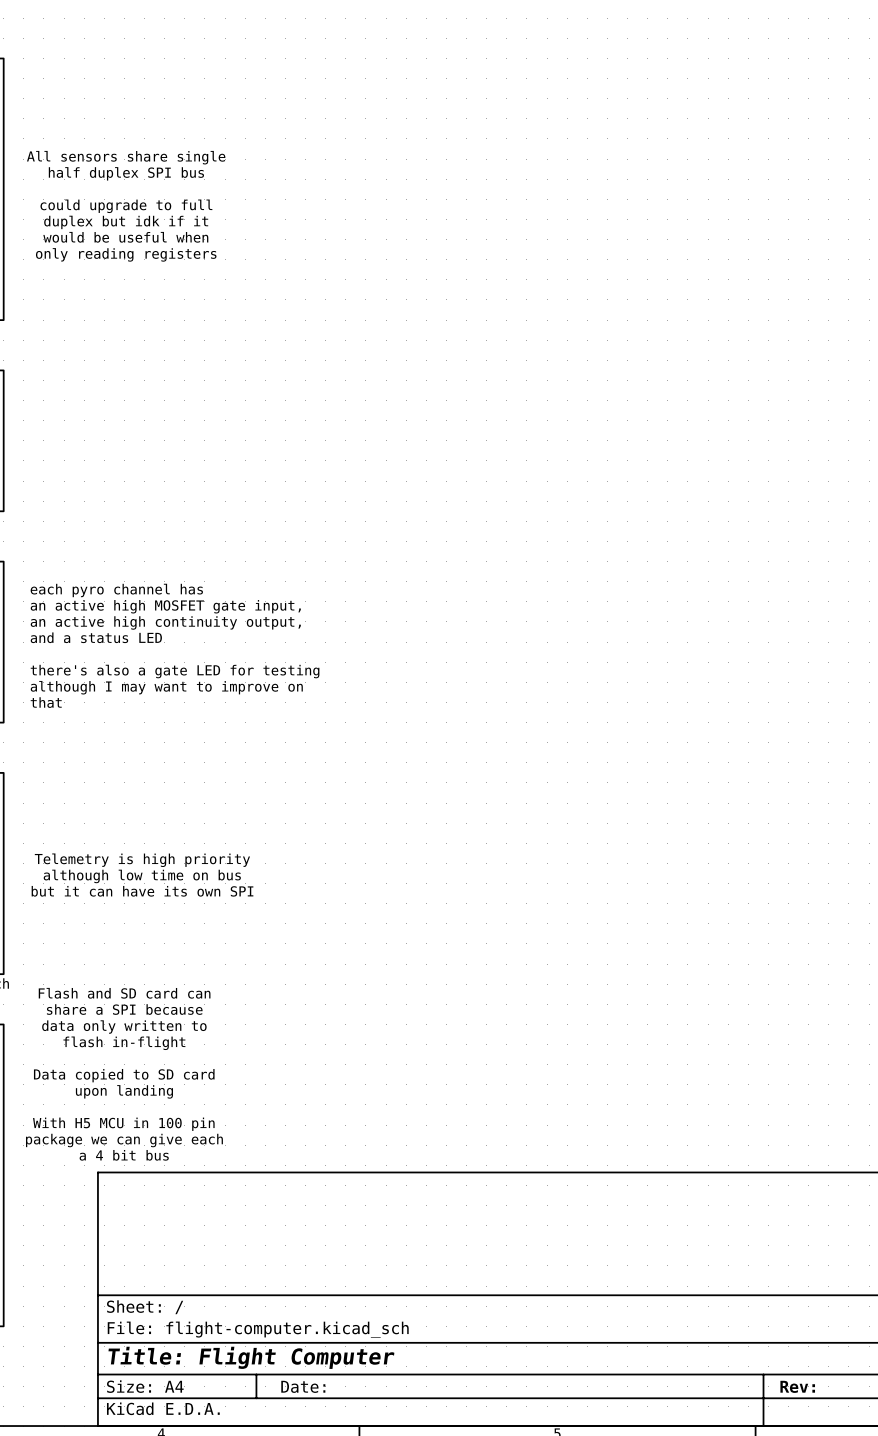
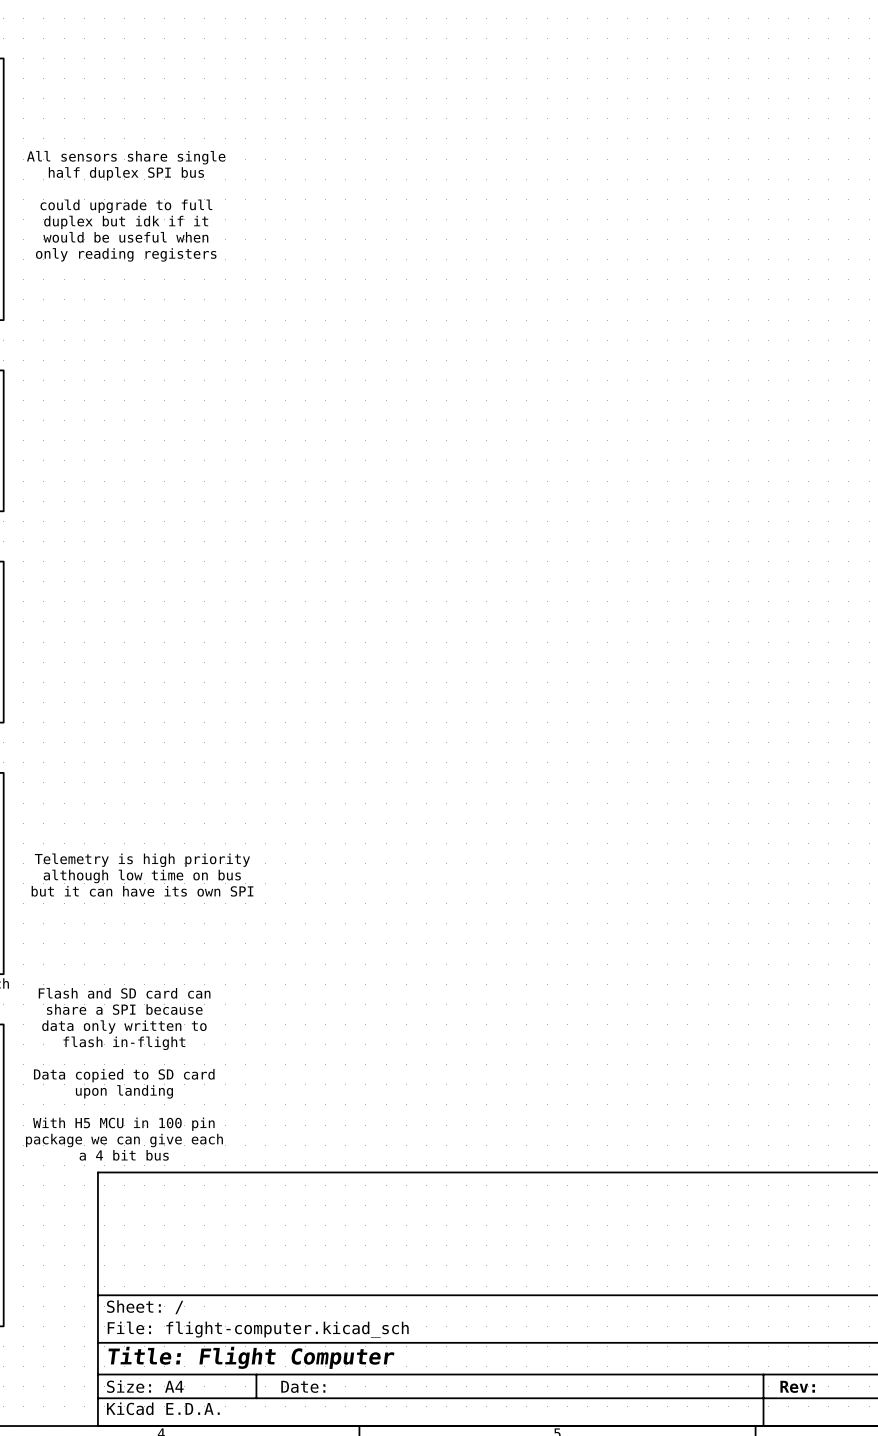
text: each pyro channel has (116, 590) -> none
text: an active high MOSFET gate input, (165, 606) -> none
text: an active high continuity output, (165, 622) -> none
text: and a status LED (96, 637) -> none
text: there's also a gate LED for testing (175, 671) -> none
text: although I may want to improve on (166, 687) -> none
text: that (46, 702) -> none

